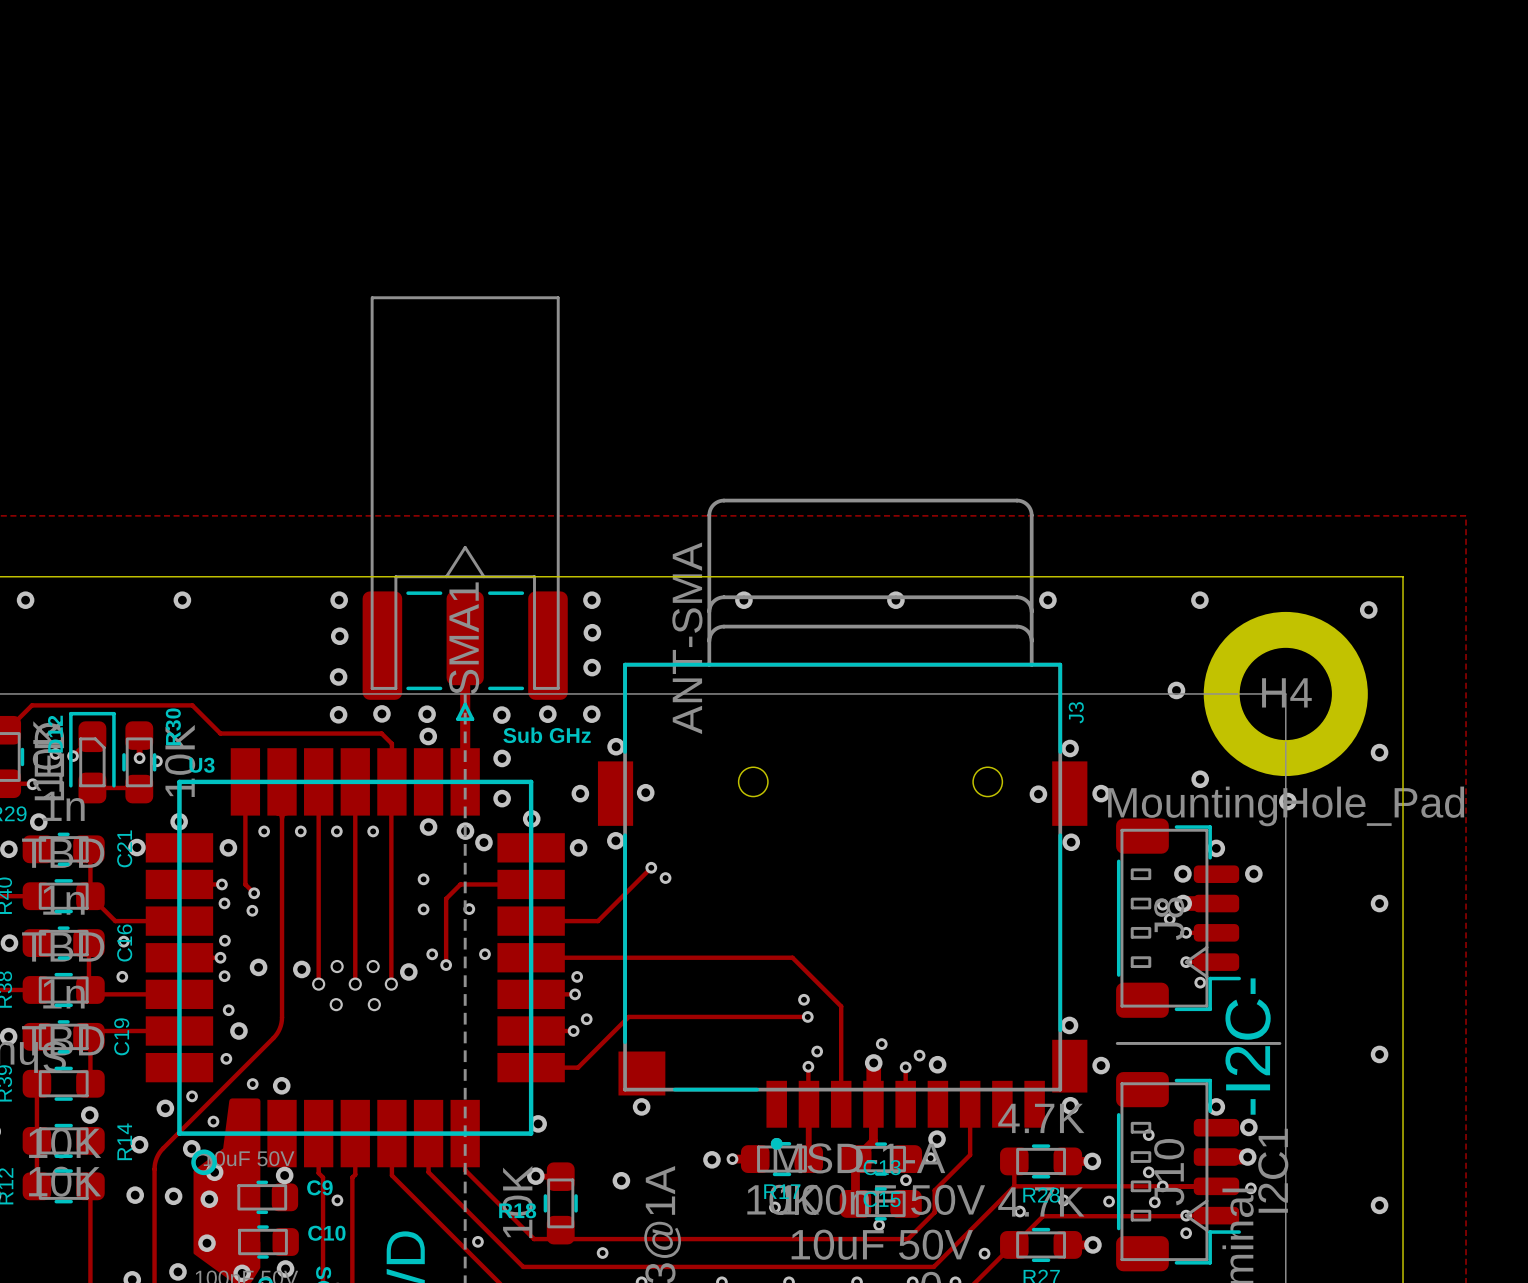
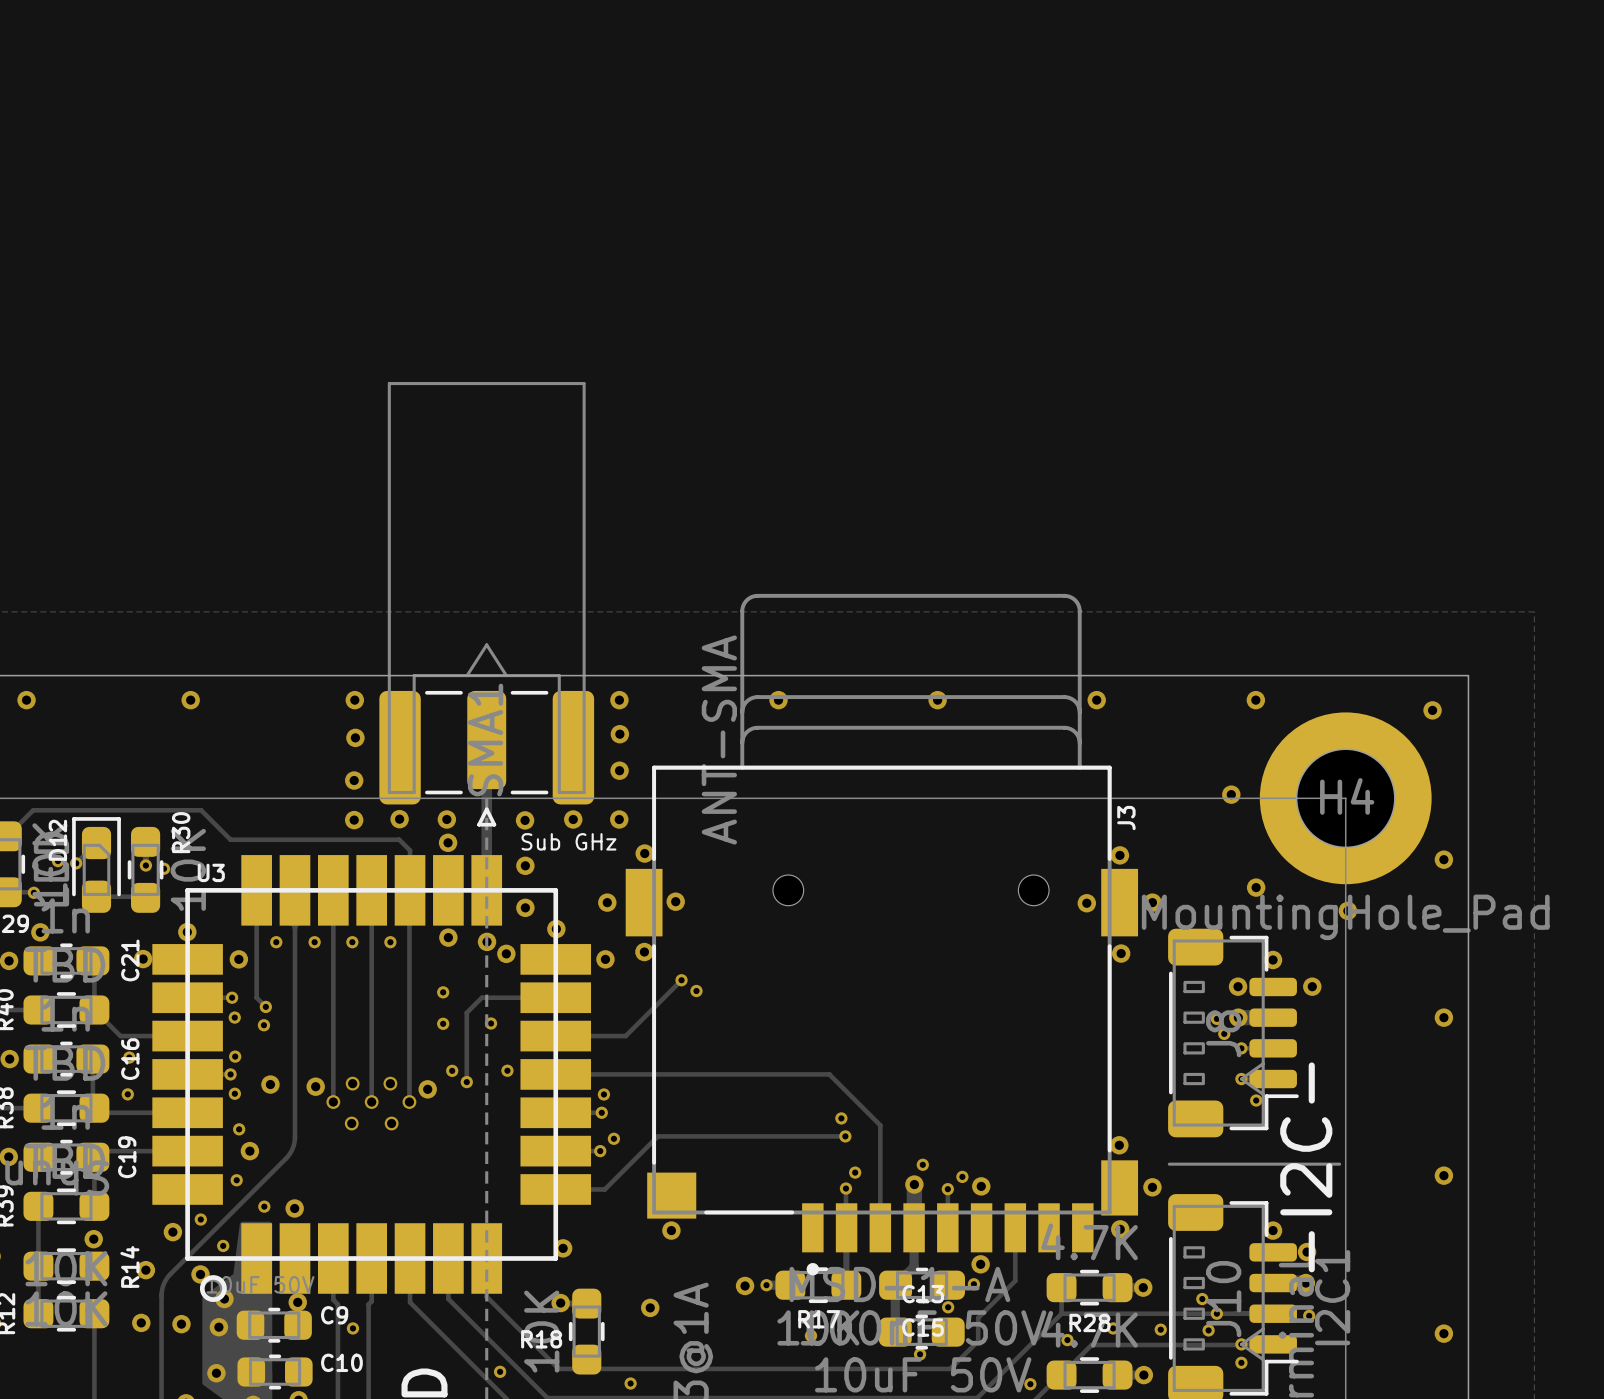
via: (1148, 1135) -> none

